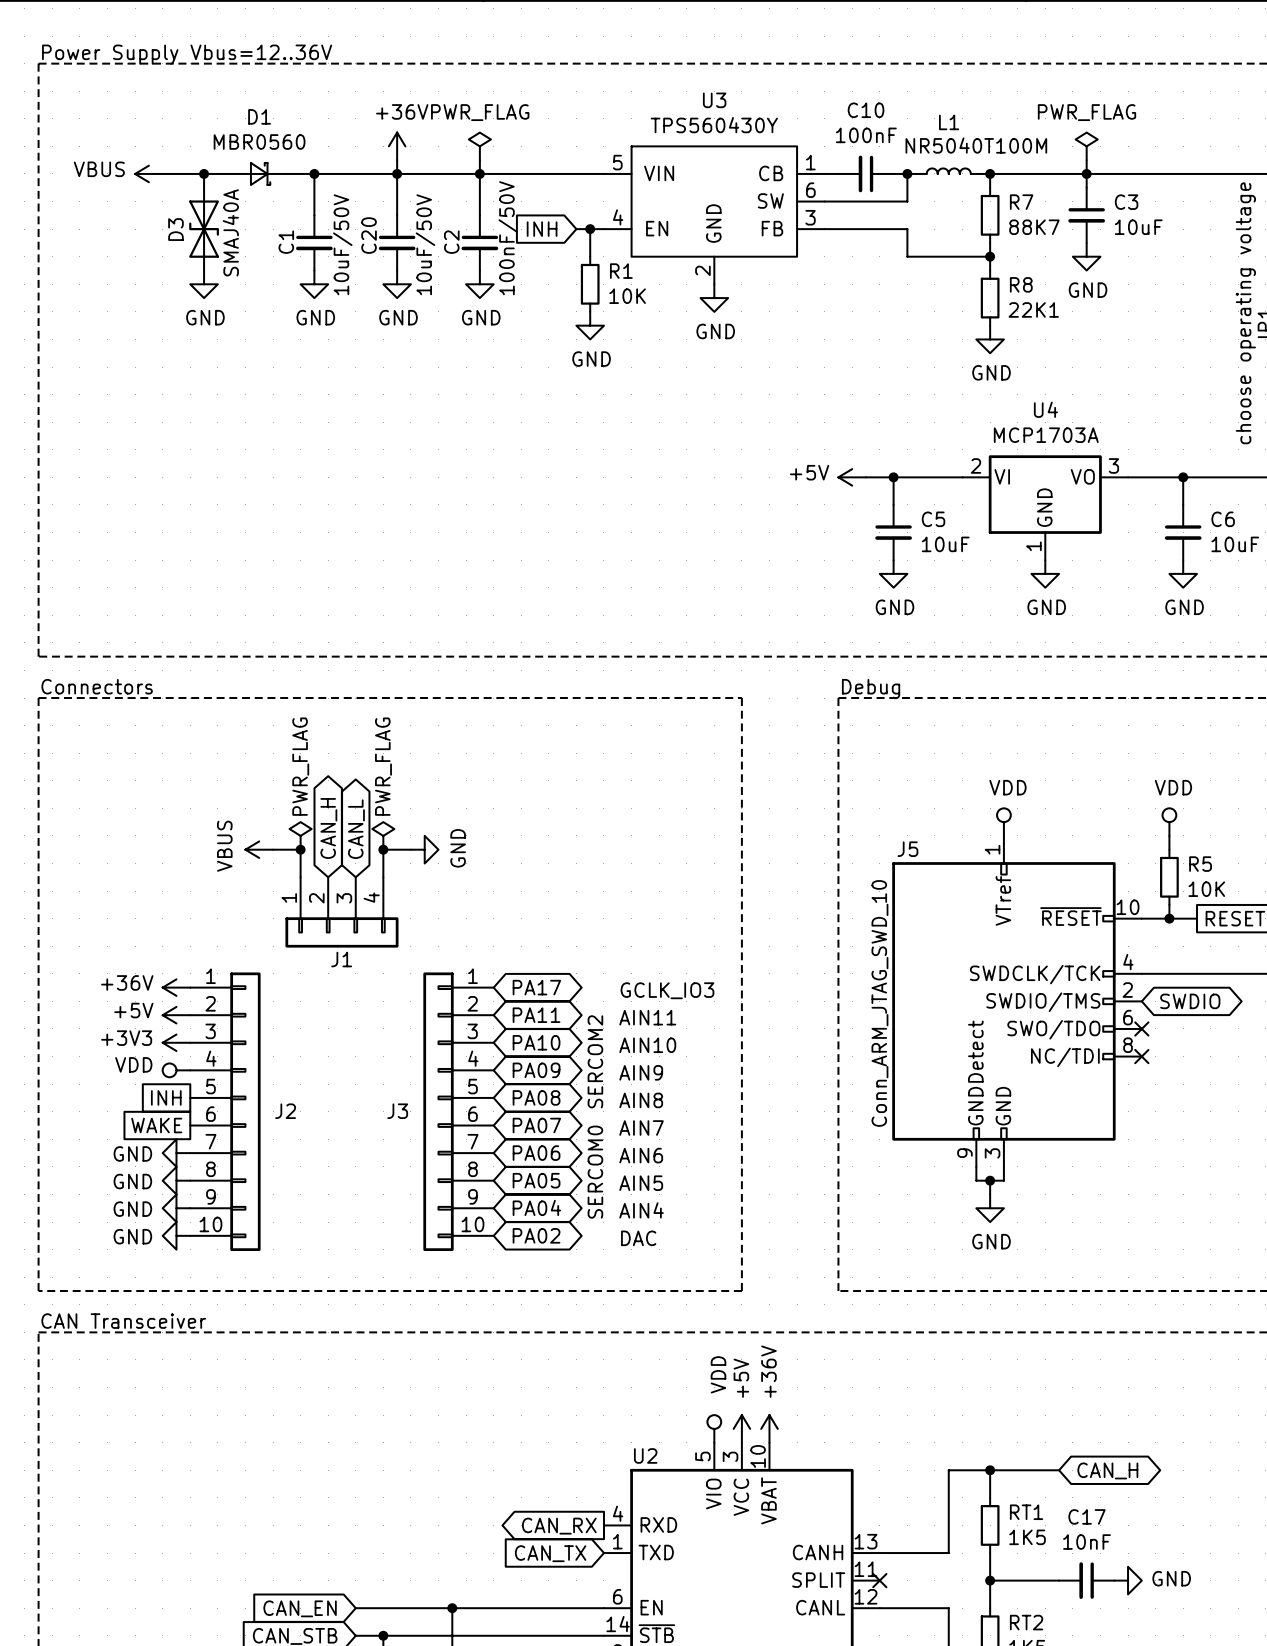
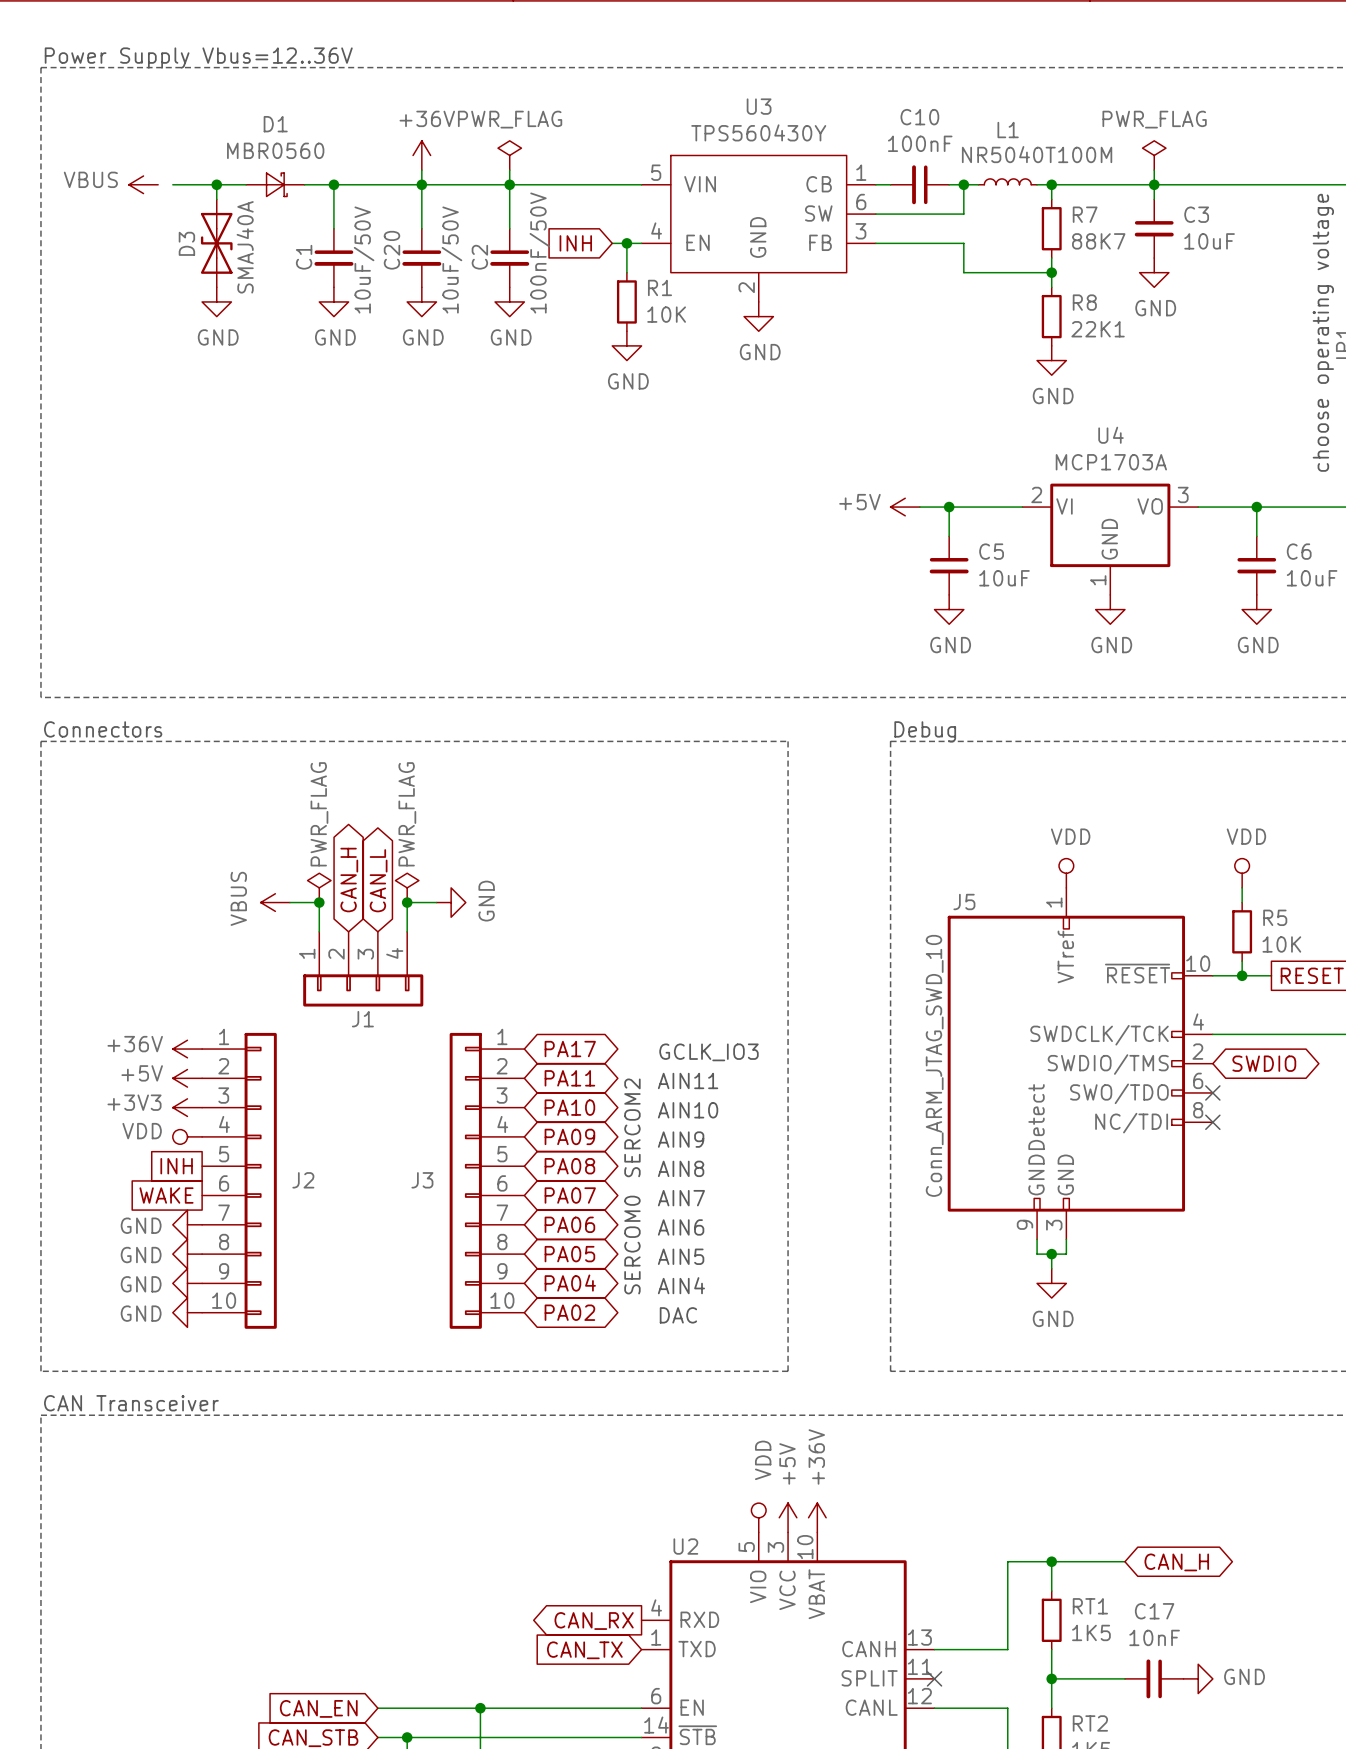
power symbol position: VBUS (148, 173) -> VBUS (143, 184)

